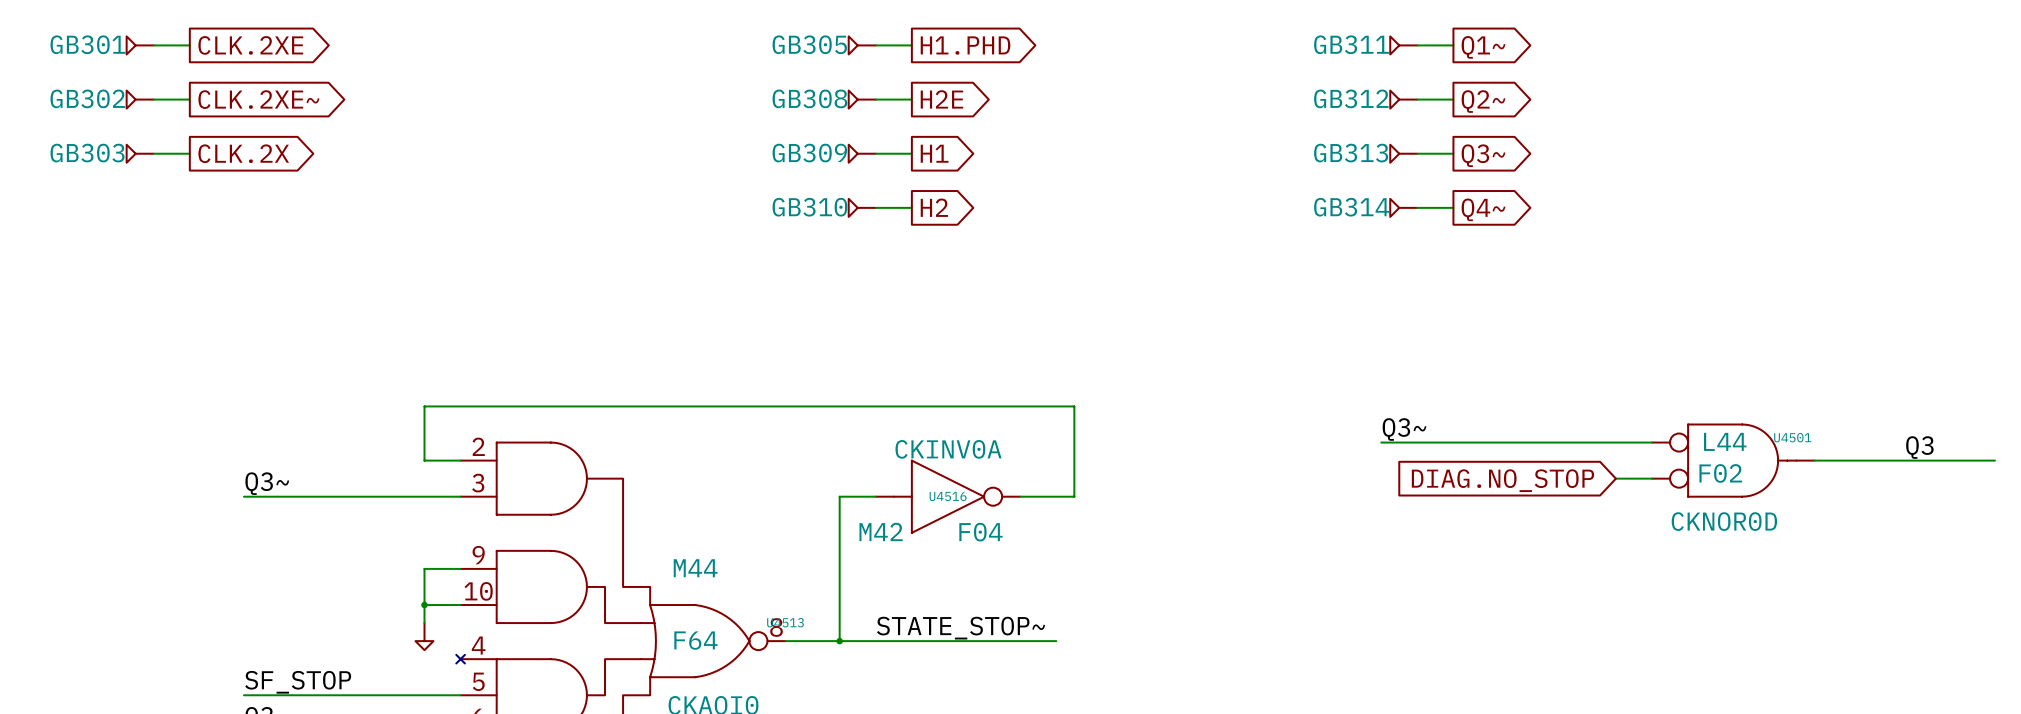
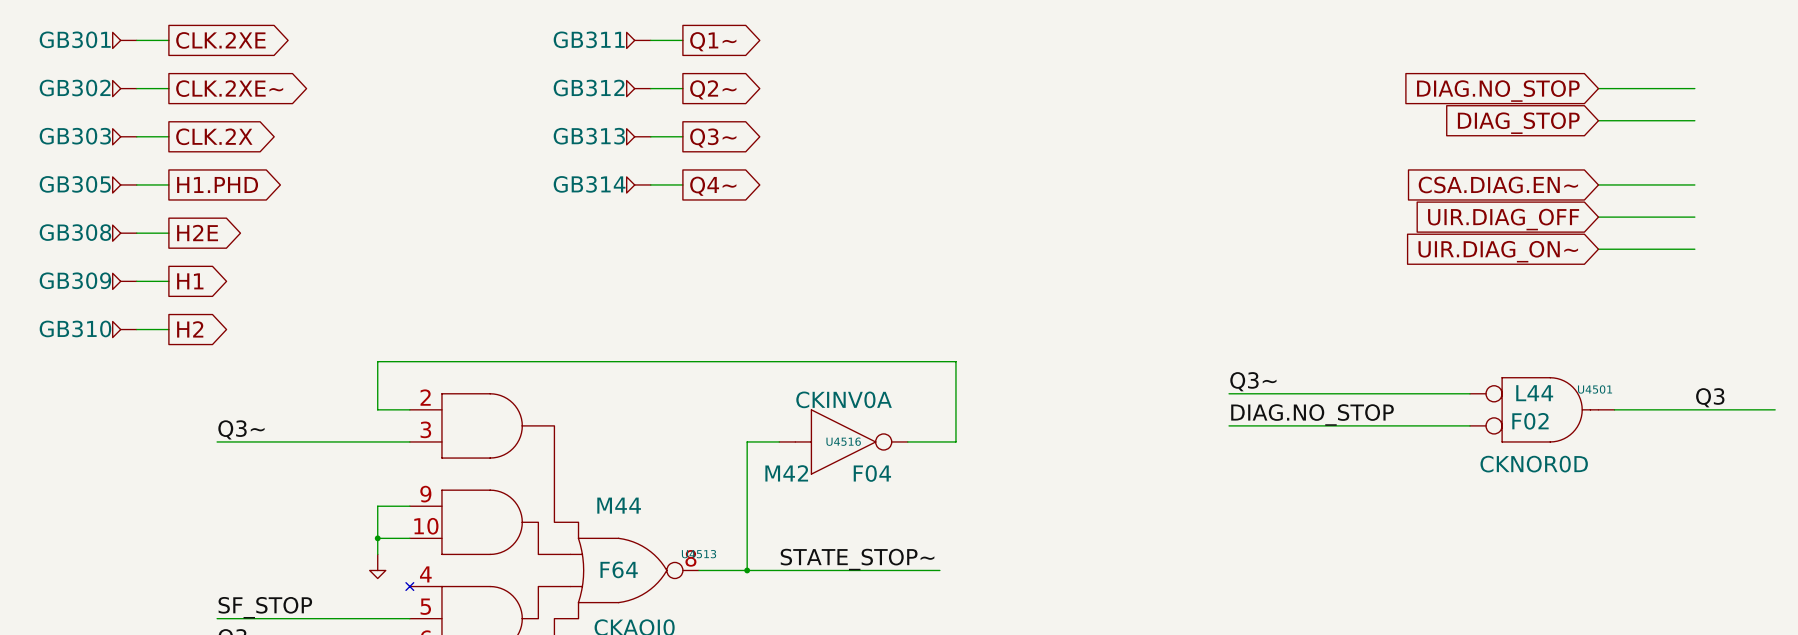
GB305 position: (861, 45) -> (124, 184)
wire: (875, 45) (911, 45) -> (650, 40) (682, 40)
global label: H1.PHD (965, 45) -> none
GB311 position: (1403, 45) -> (638, 40)
wire: (1417, 45) (1453, 45) -> none
global label: none -> Q1~ (713, 41)
global label: Q1~ (1483, 47) -> none
GB308 position: (861, 99) -> (124, 233)
wire: (875, 99) (911, 99) -> (650, 88) (682, 88)
global label: H2E (941, 99) -> none
GB312 position: (1403, 99) -> (638, 88)
wire: (1417, 99) (1453, 99) -> none
wire: none -> (1598, 88) (1694, 88)
global label: none -> Q2~ (713, 89)
global label: Q2~ (1483, 101) -> none
global label: none -> DIAG.NO_STOP (1498, 91)
wire: none -> (1598, 120) (1694, 120)
global label: none -> DIAG_STOP (1518, 123)
GB309 position: (861, 153) -> (124, 281)
wire: (875, 153) (911, 153) -> (650, 136) (682, 136)
global label: H1 (934, 153) -> none
GB313 position: (1403, 153) -> (638, 136)
wire: (1417, 153) (1453, 153) -> none
global label: none -> Q3~ (713, 138)
global label: Q3~ (1483, 155) -> none
wire: none -> (136, 184) (168, 184)
GB310 position: (861, 207) -> (124, 329)
wire: (875, 207) (911, 207) -> (650, 184) (682, 184)
global label: H2 (934, 207) -> none
GB314 position: (1403, 207) -> (638, 184)
wire: (1417, 207) (1453, 207) -> none
global label: none -> CSA.DIAG.EN~ (1498, 184)
wire: none -> (1598, 184) (1694, 184)
global label: none -> H1.PHD (217, 184)
global label: none -> Q4~ (713, 186)
global label: Q4~ (1483, 209) -> none
wire: none -> (1598, 217) (1694, 217)
global label: none -> UIR.DIAG_OFF (1503, 219)
global label: none -> H2E (197, 233)
wire: none -> (136, 233) (168, 233)
wire: none -> (1598, 249) (1694, 249)
global label: none -> UIR.DIAG_ON~ (1498, 251)
wire: none -> (136, 281) (168, 281)
global label: none -> H1 (190, 281)
wire: none -> (136, 329) (168, 329)
global label: none -> H2 (190, 329)
label: none -> DIAG.NO_STOP (1312, 415)
wire: none -> (1229, 425) (1437, 425)
global label: DIAG.NO_STOP (1502, 480) -> none

